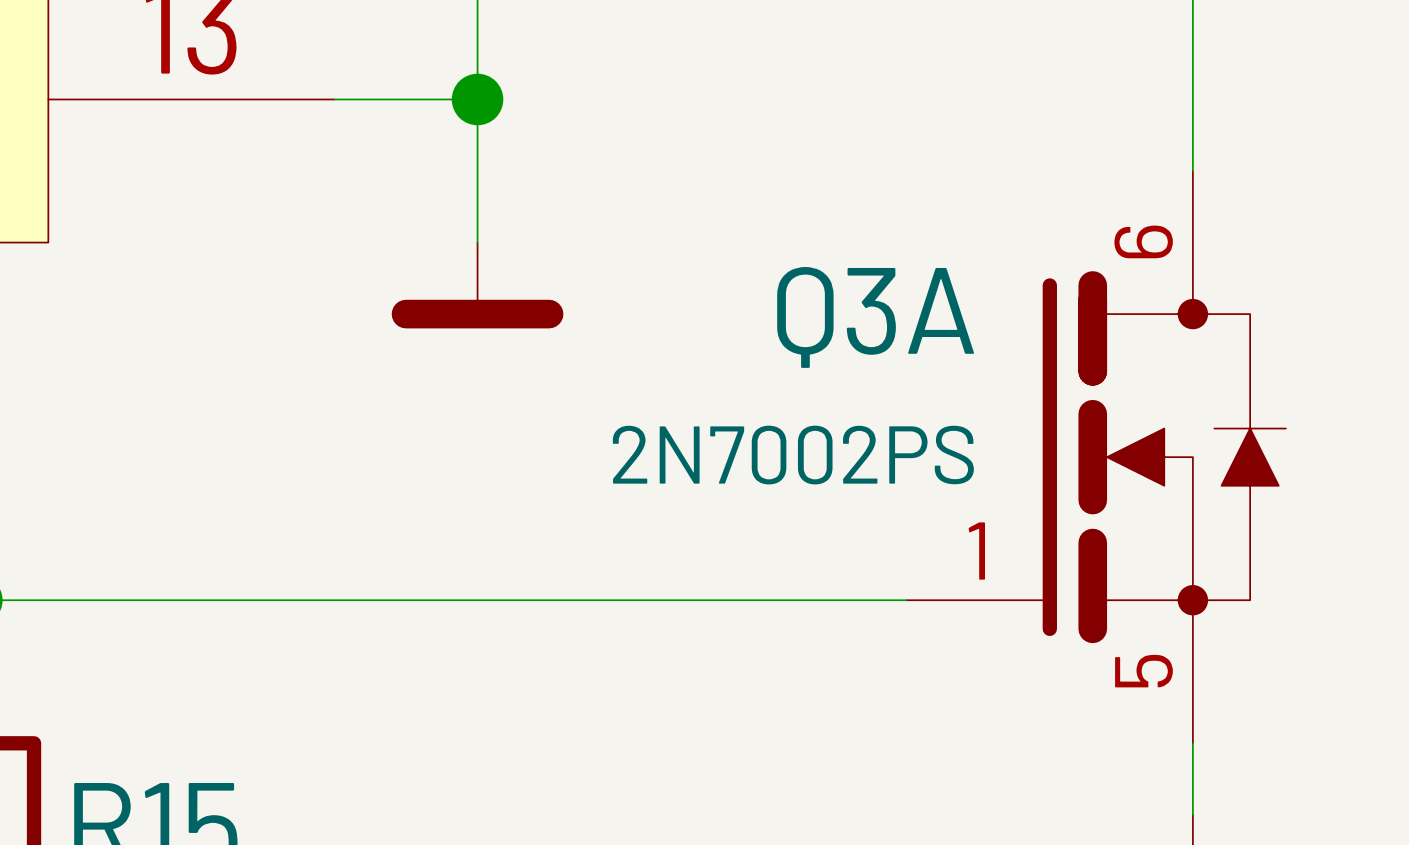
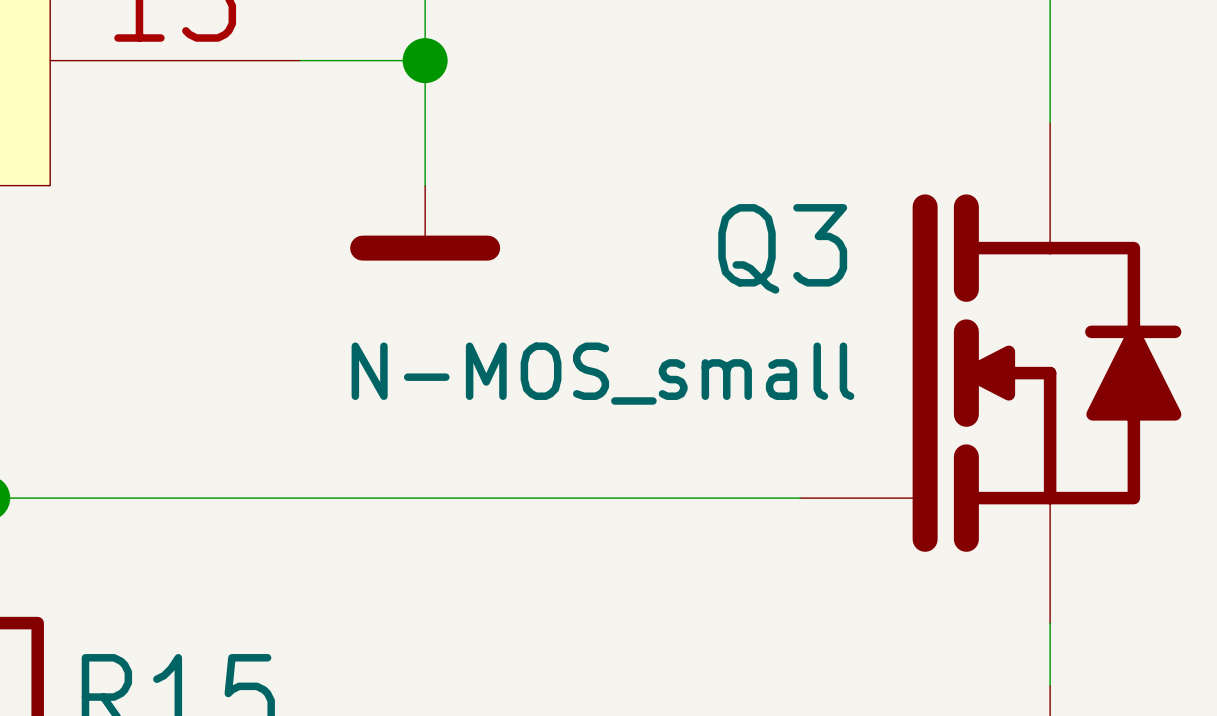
Q3A: 2N7002PS (1096, 457) -> none
Q3: none -> N-MOS_small (990, 373)

